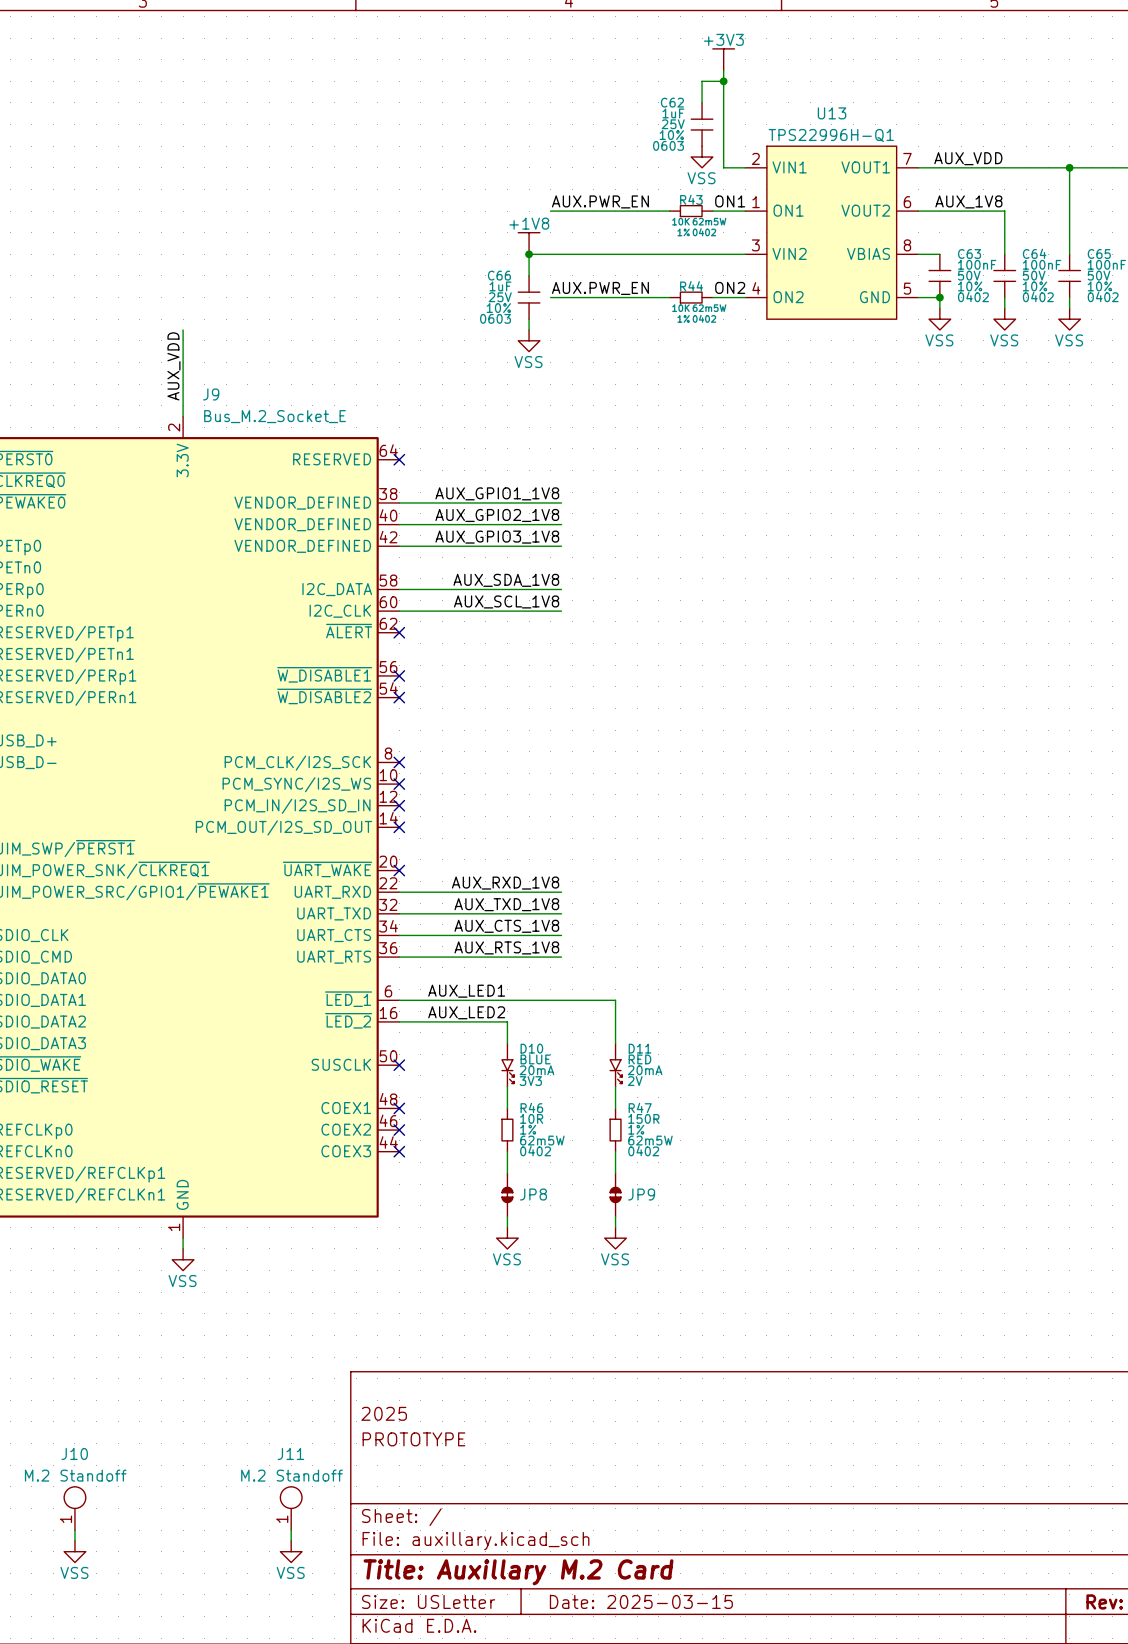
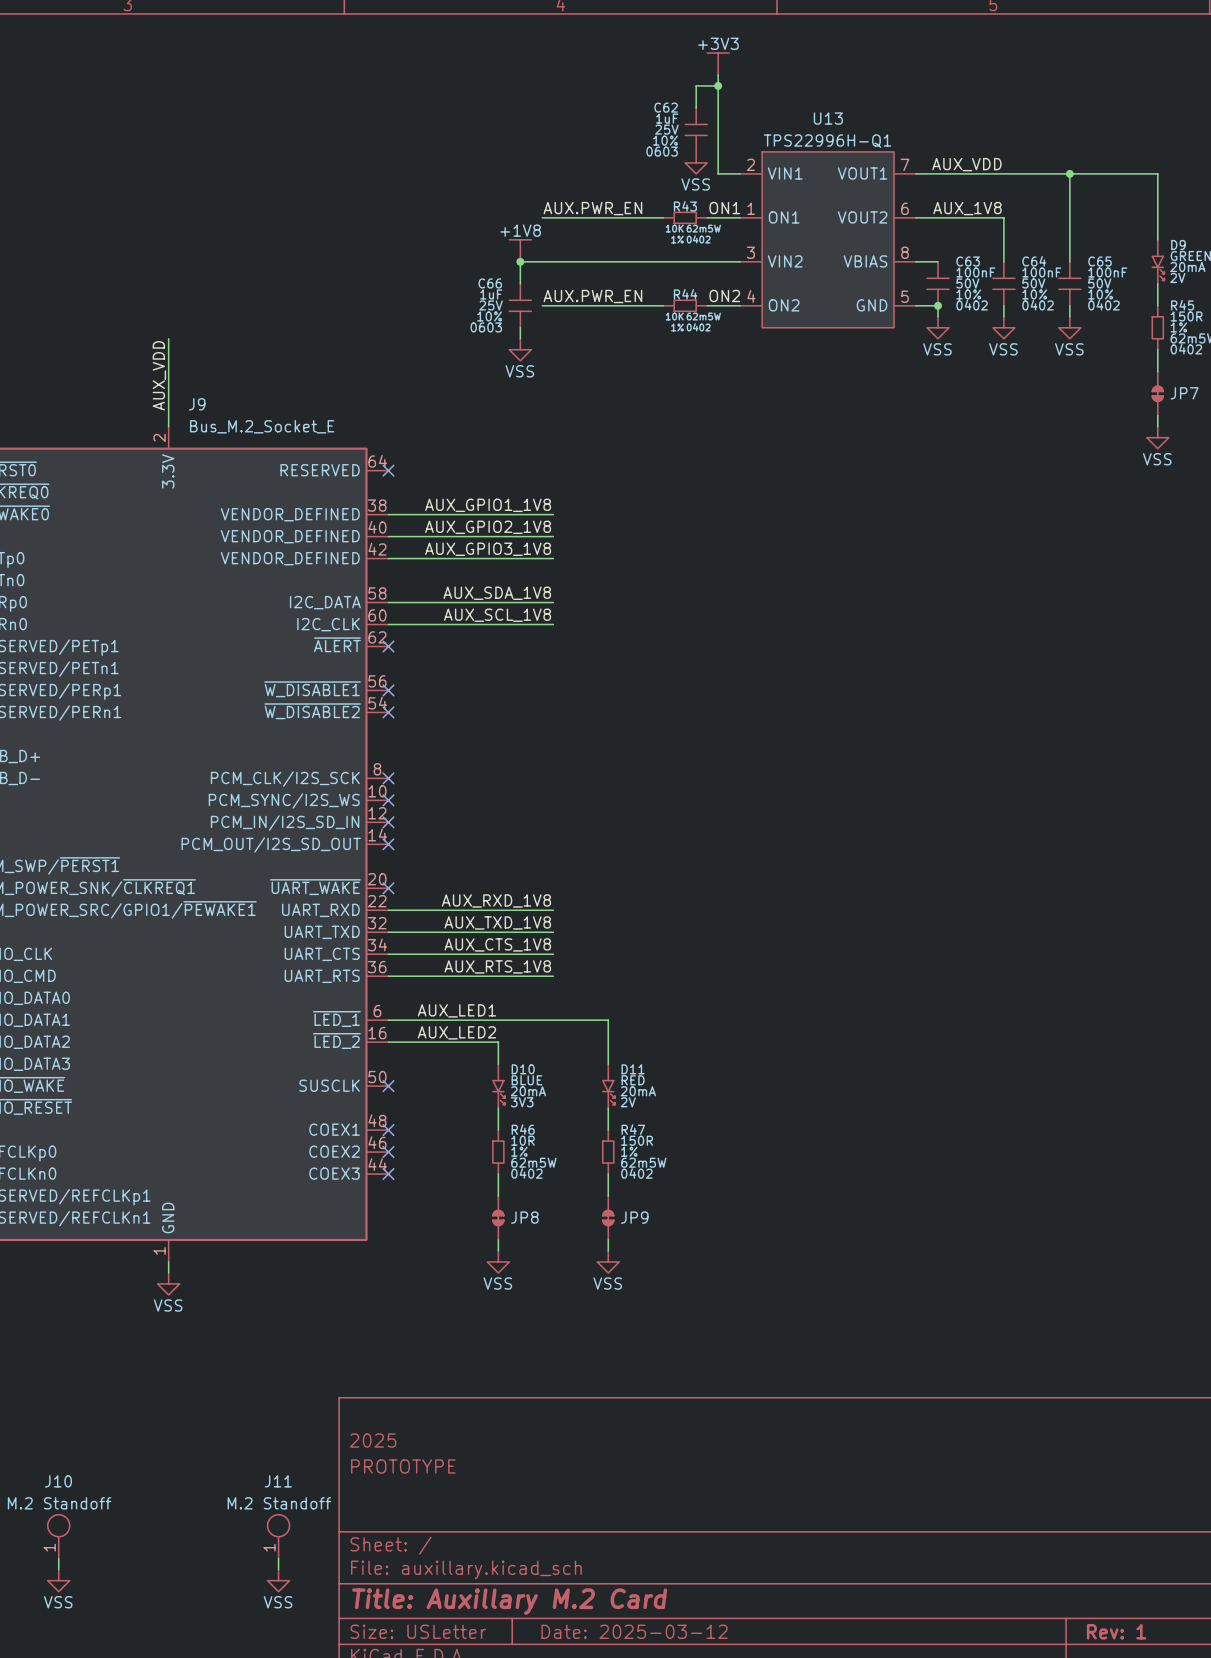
title block: Date: 2025-03-15 (641, 1601) -> Date: 2025-03-12 (634, 1631)

